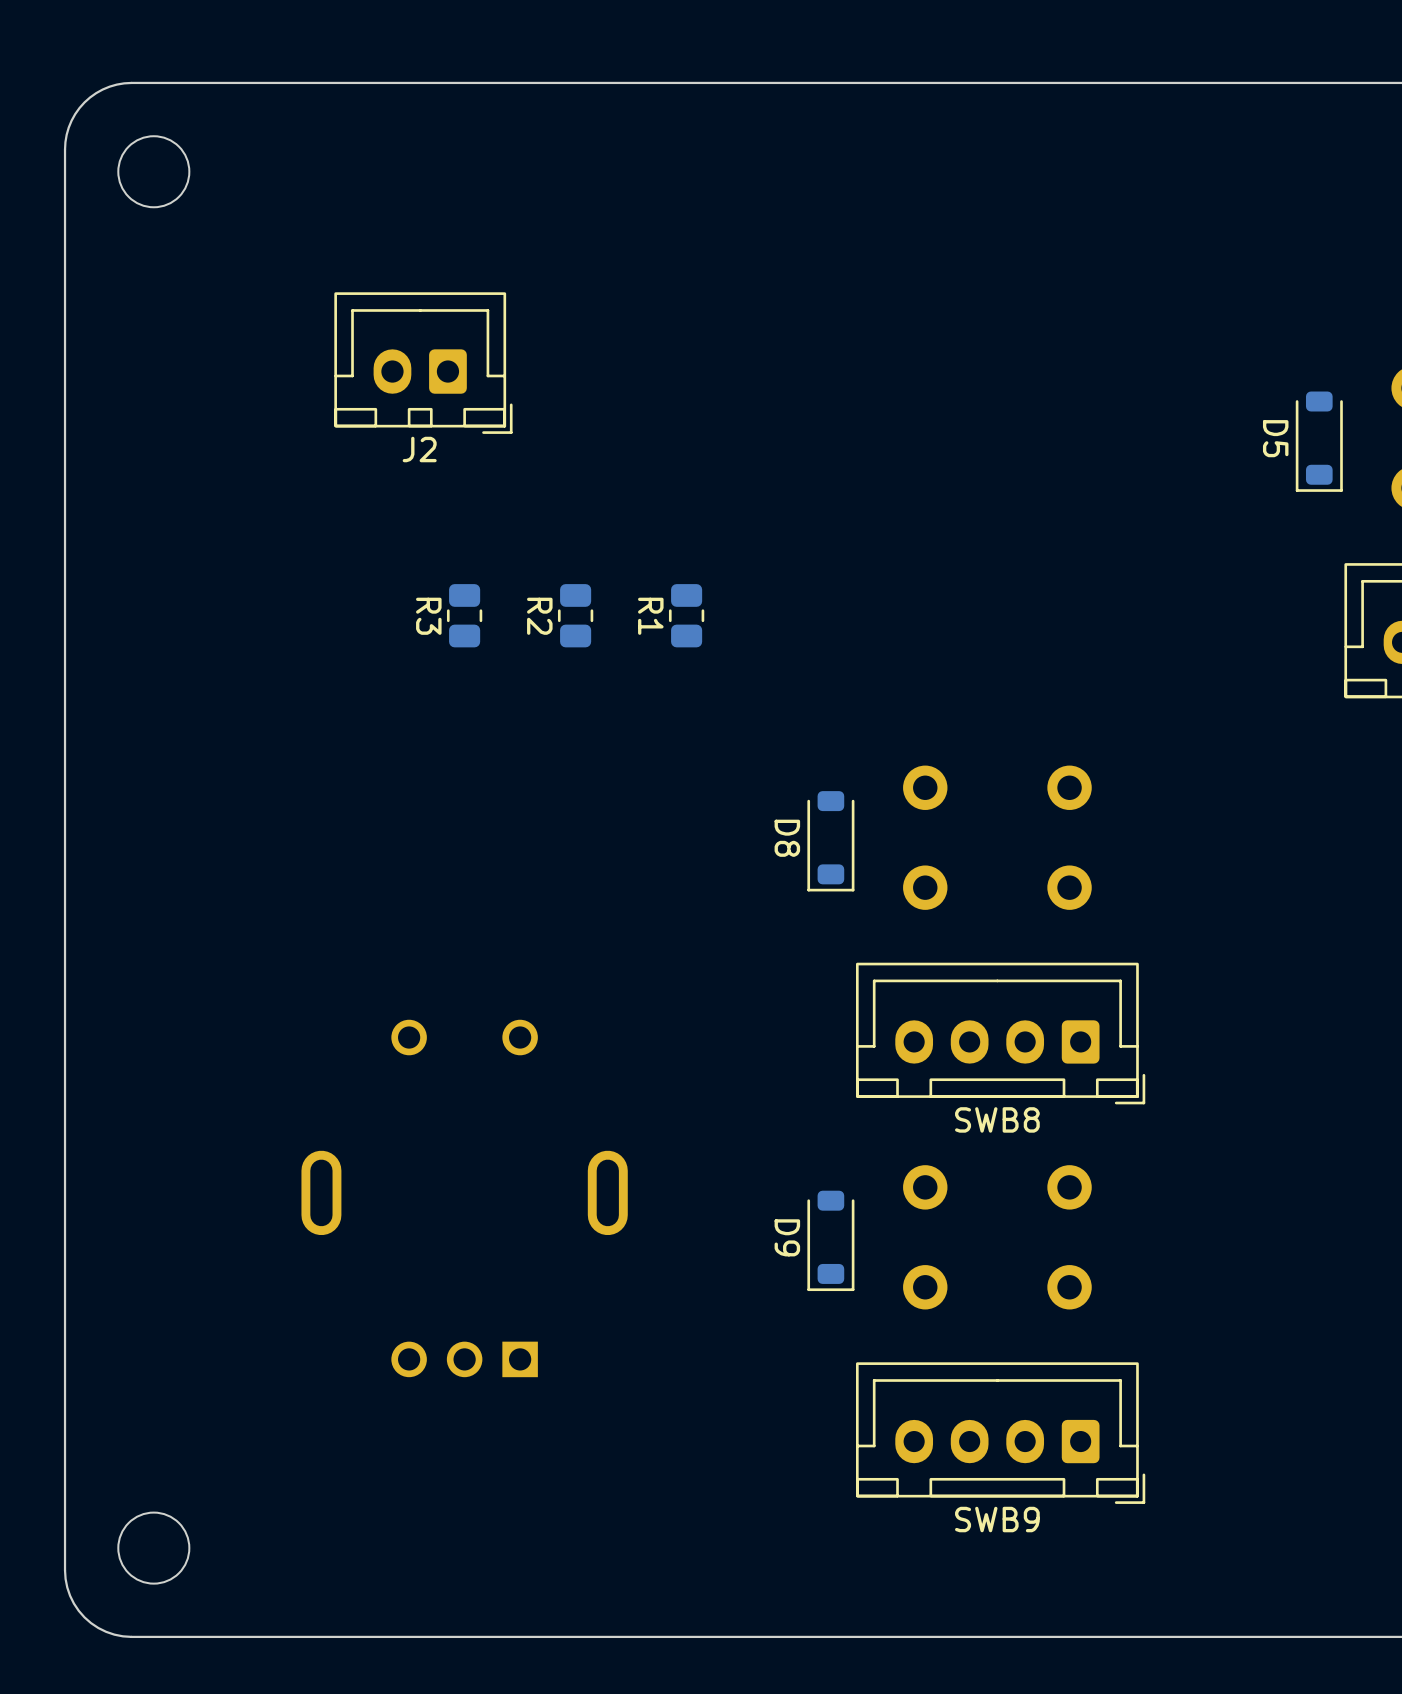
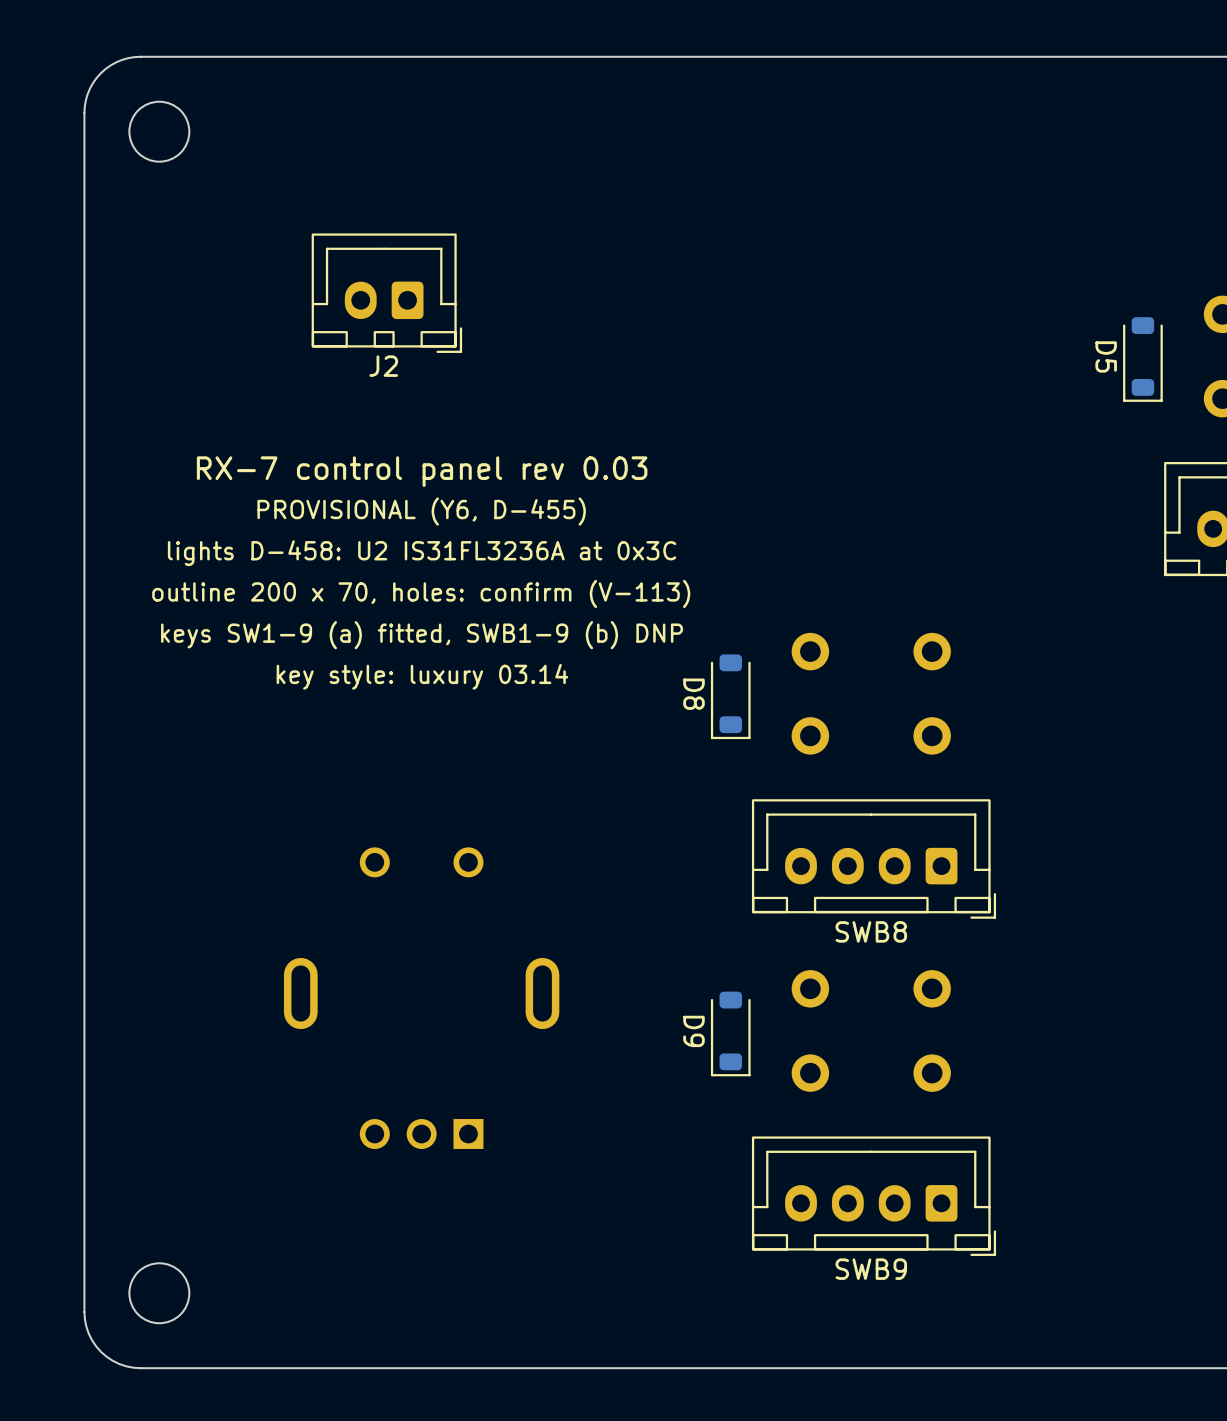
text: none -> RX-7 control panel rev 0.03 (422, 471)
R3: (464, 615) -> none
R2: (575, 615) -> none
R1: (686, 615) -> none
text: none -> PROVISIONAL (Y6, D-455) (421, 511)
text: none -> lights D-458: U2 IS31FL3236A at 0x3C (422, 553)
text: none -> outline 200 x 70, holes: confirm (V-113) (421, 593)
text: none -> keys SW1-9 (a) fitted, SWB1-9 (b) DNP (422, 635)
text: none -> key style: luxury 03.14 (422, 676)

